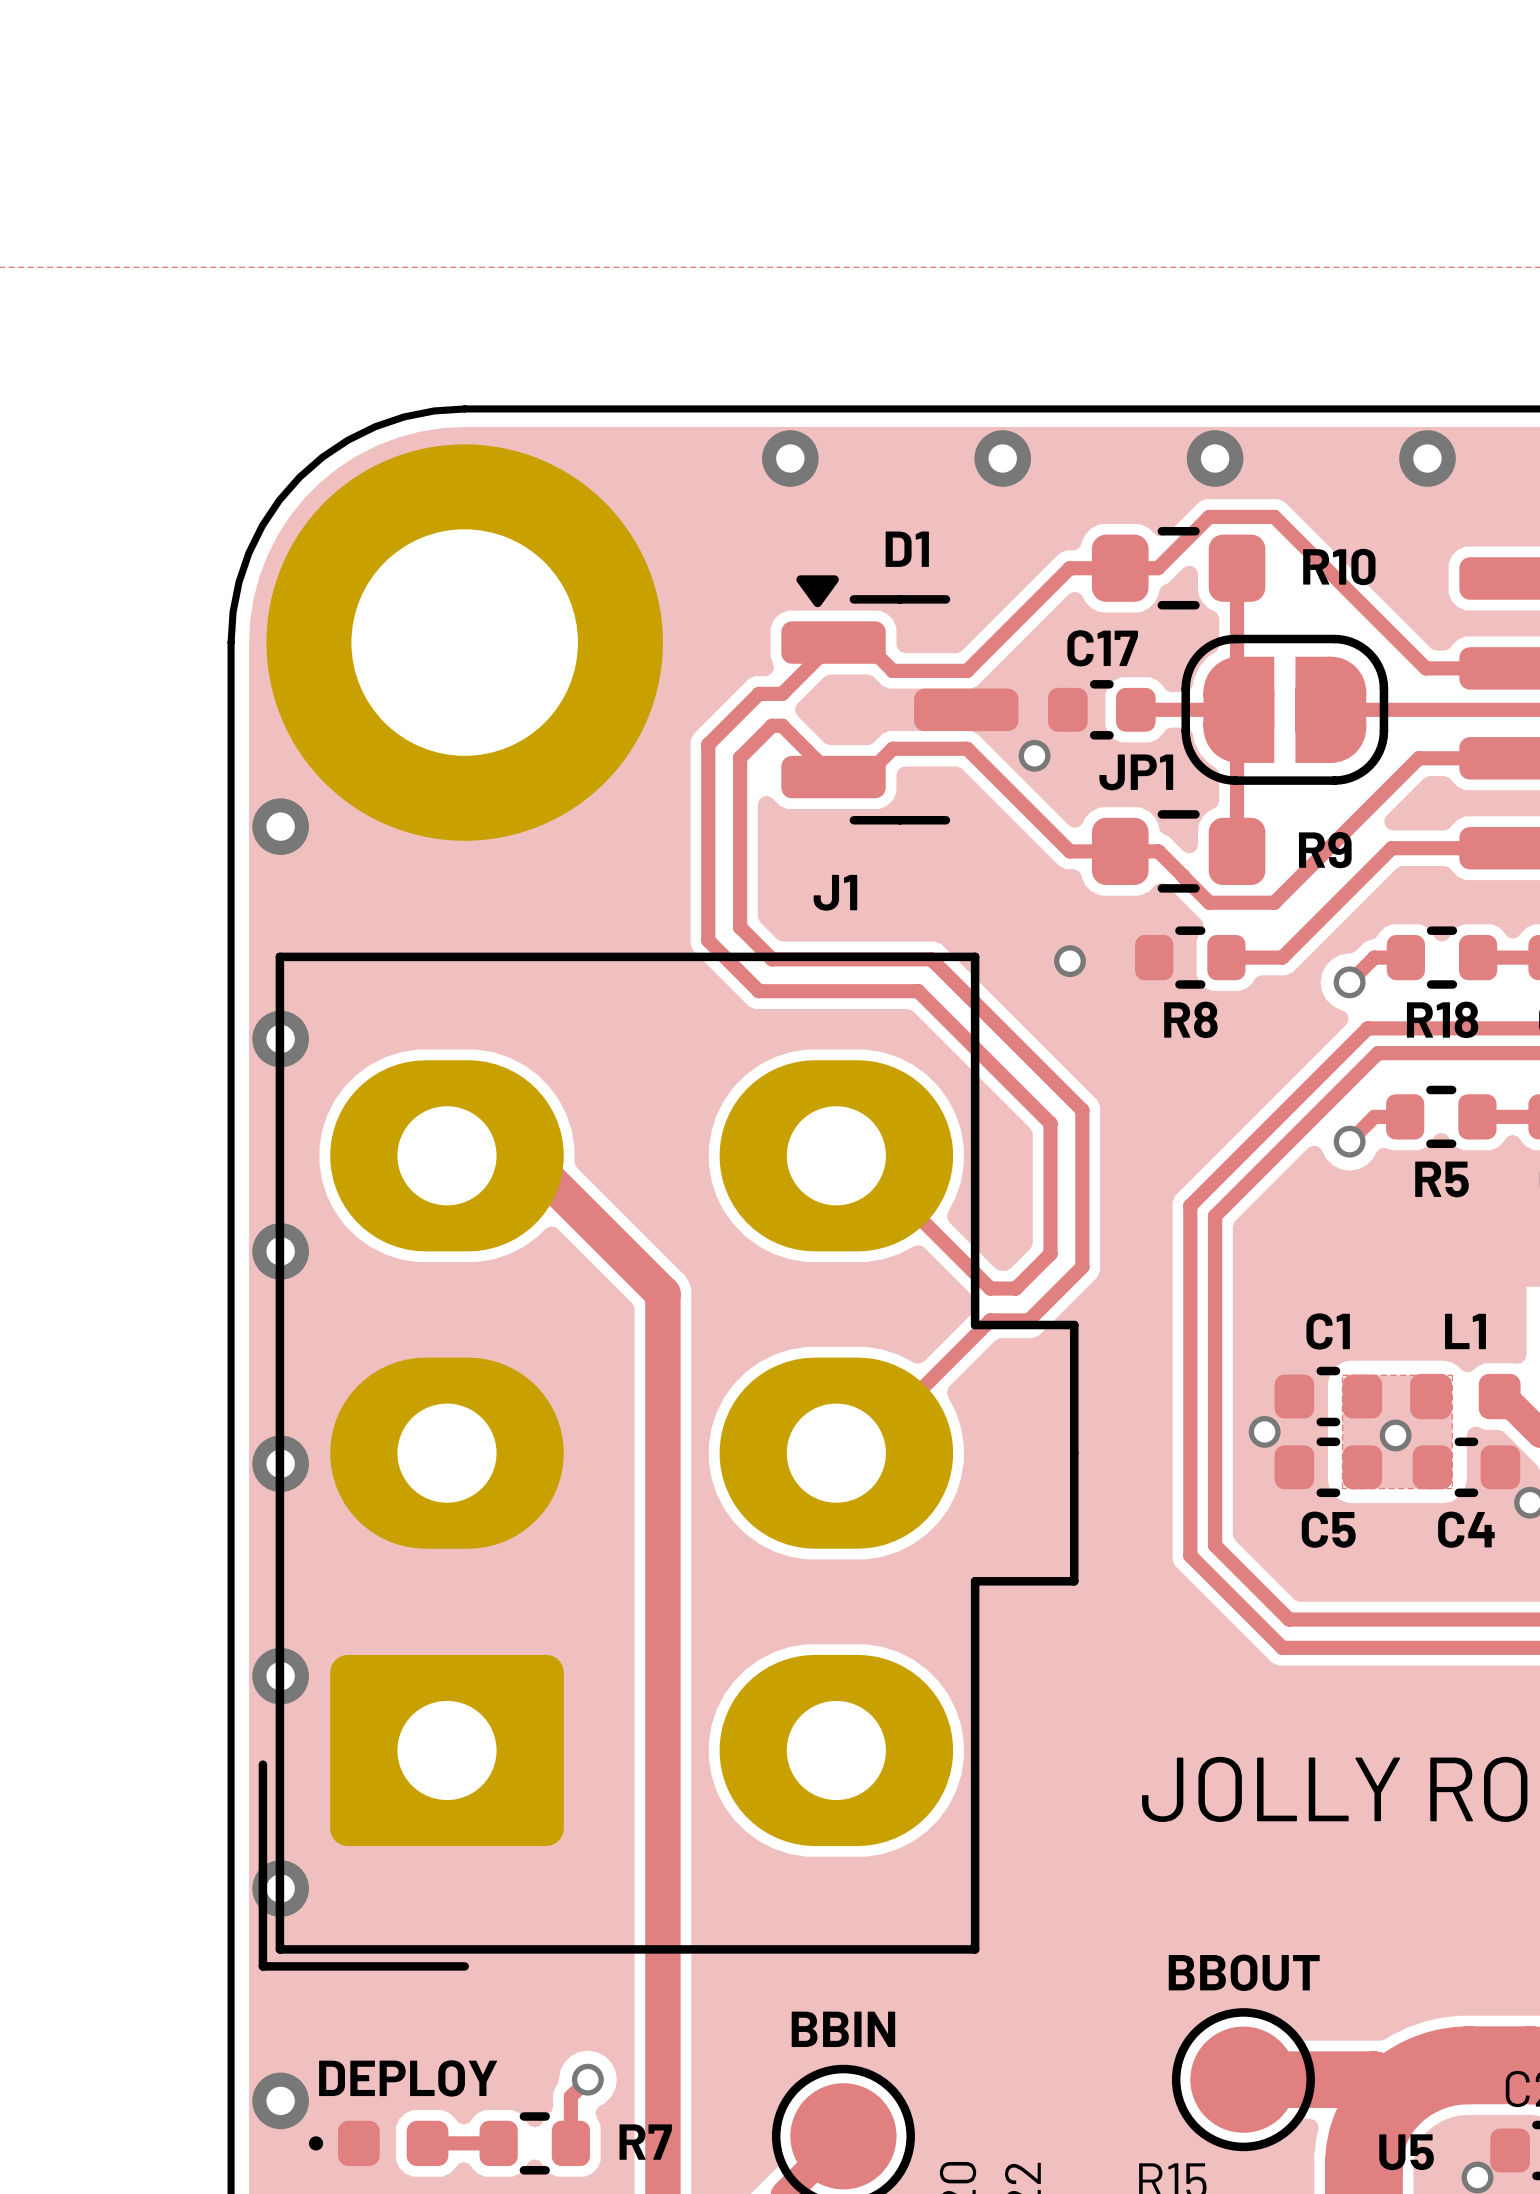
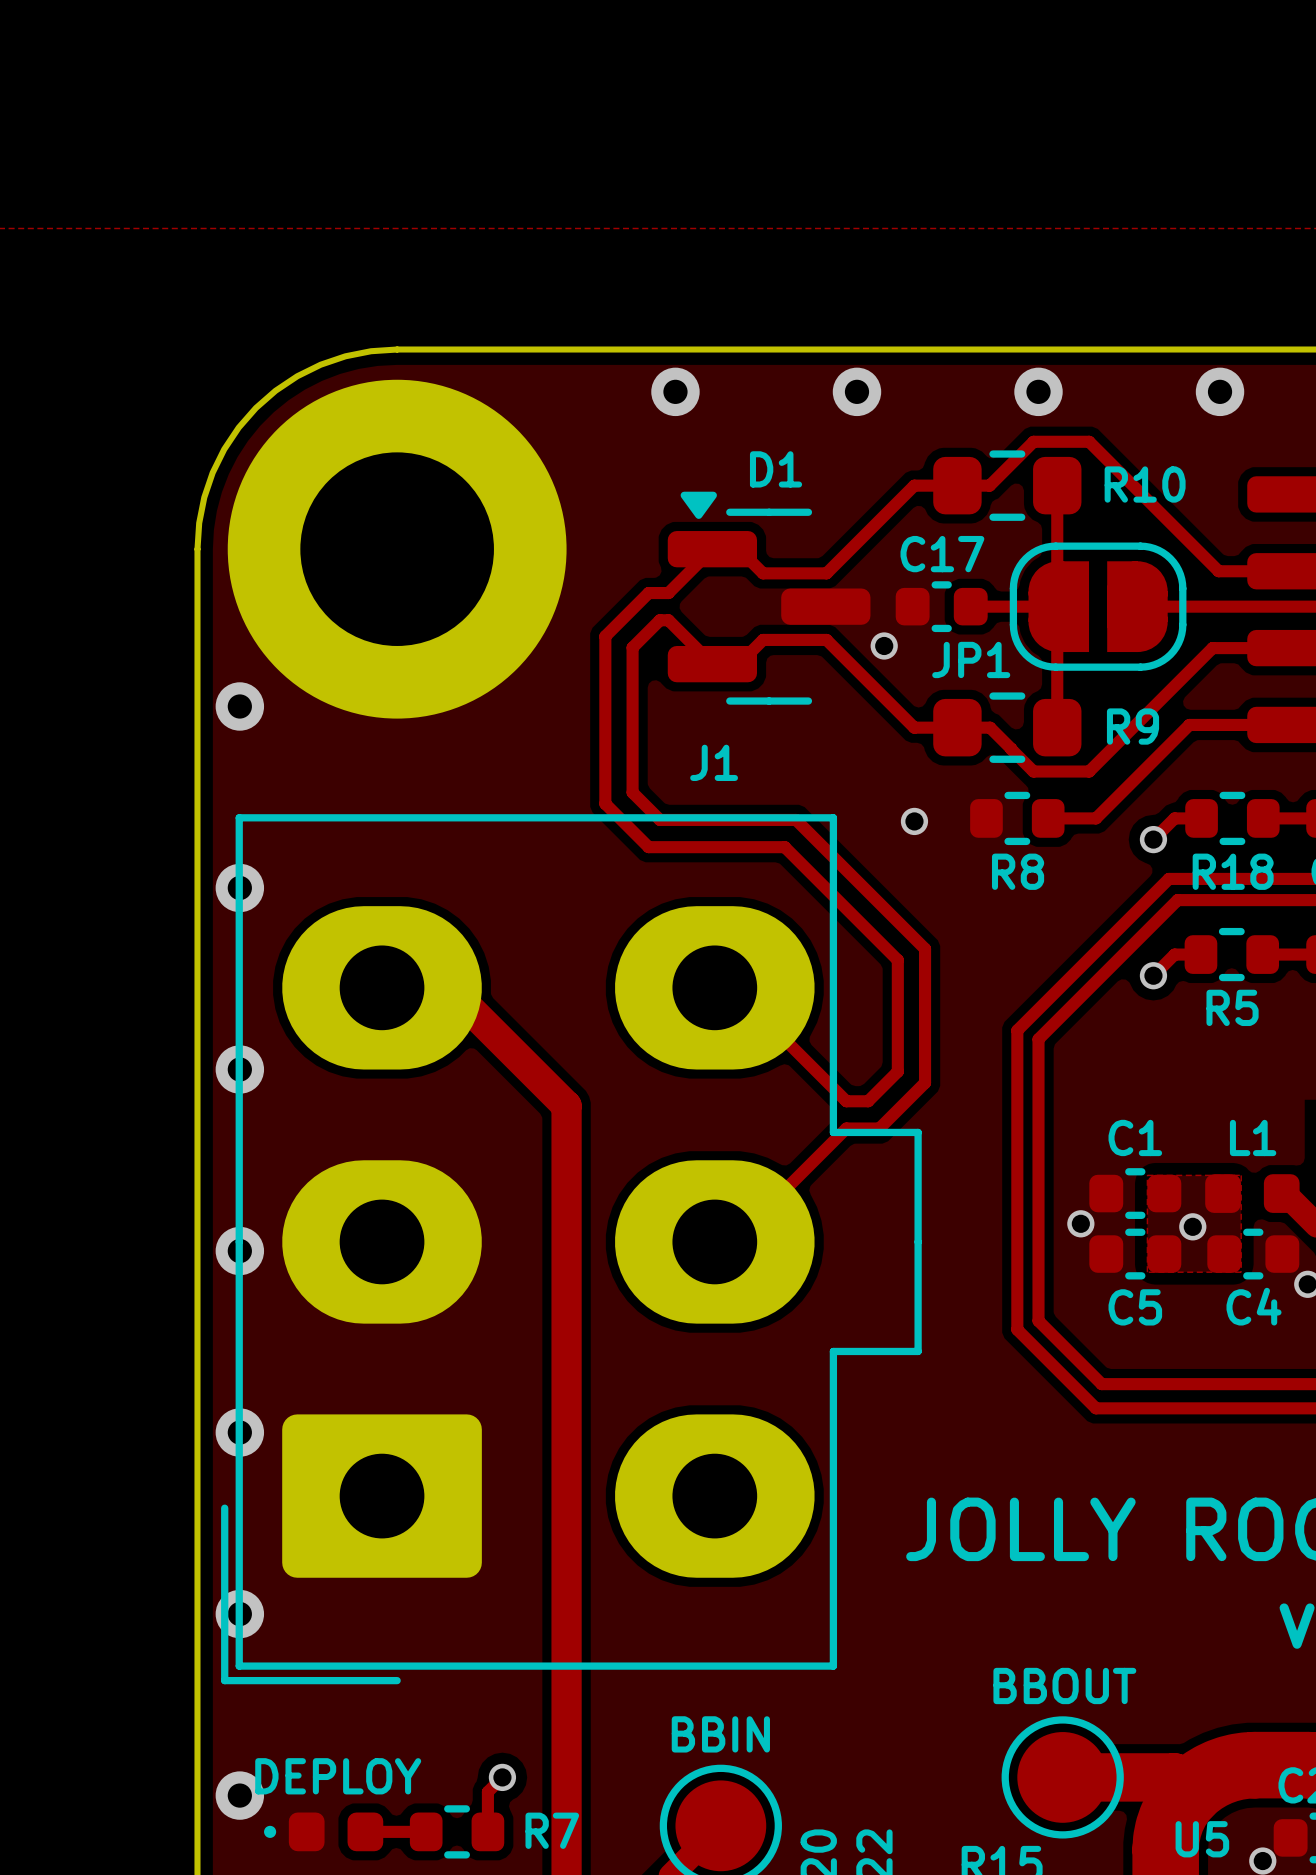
text position: DEPLOY (408, 2078) -> DEPLOY (338, 1776)

